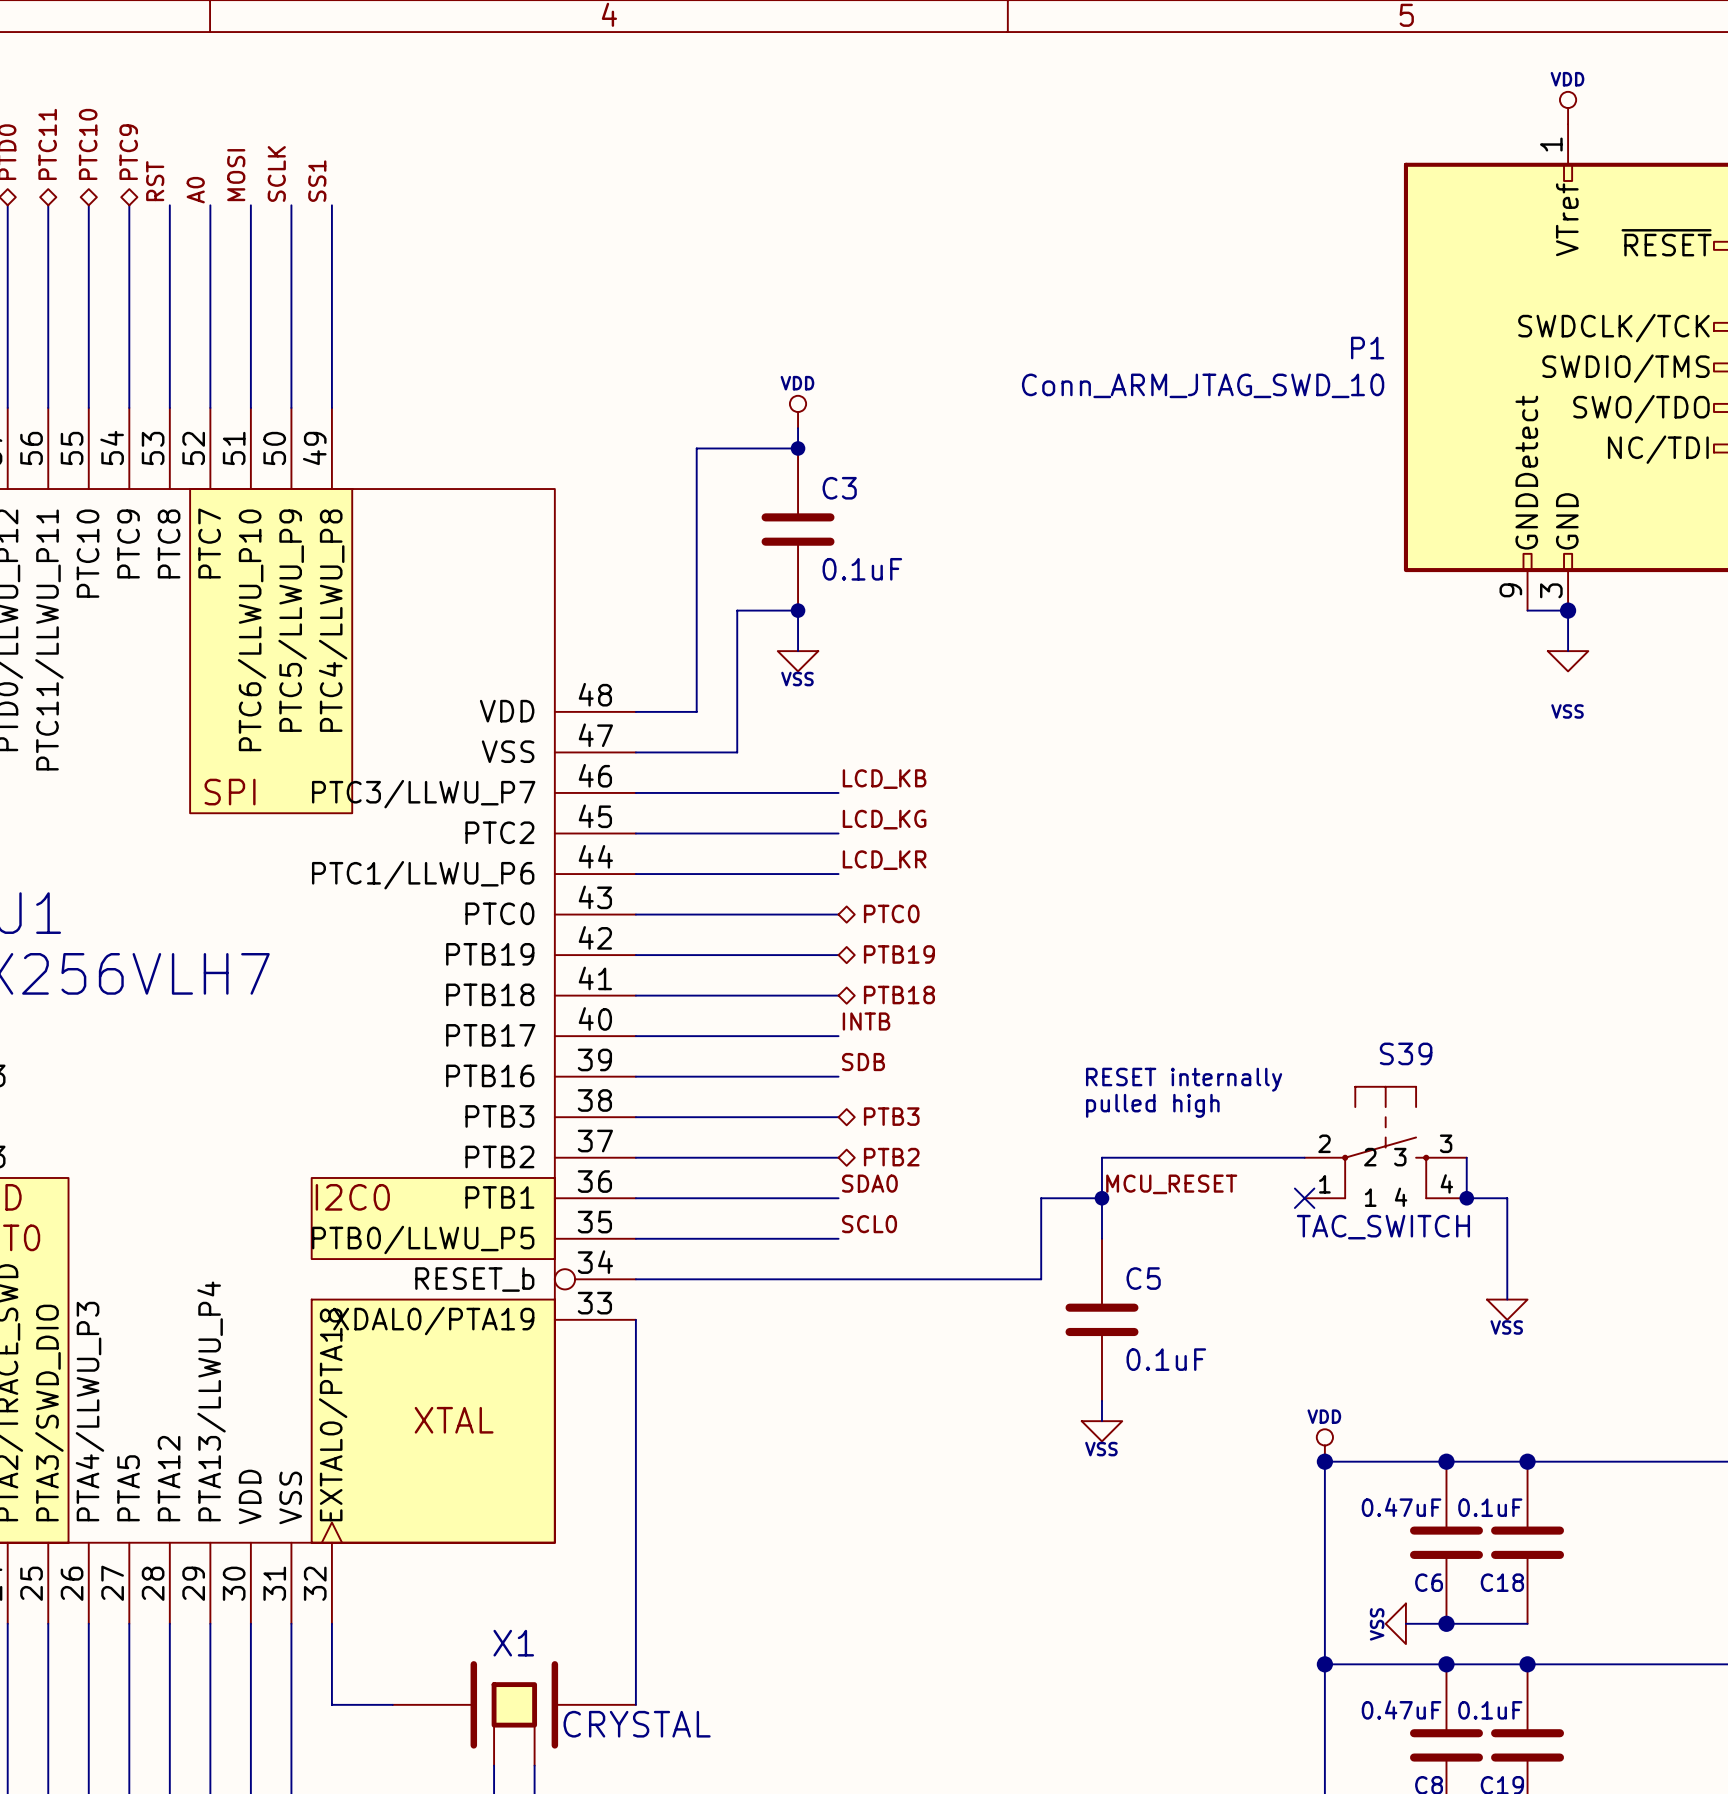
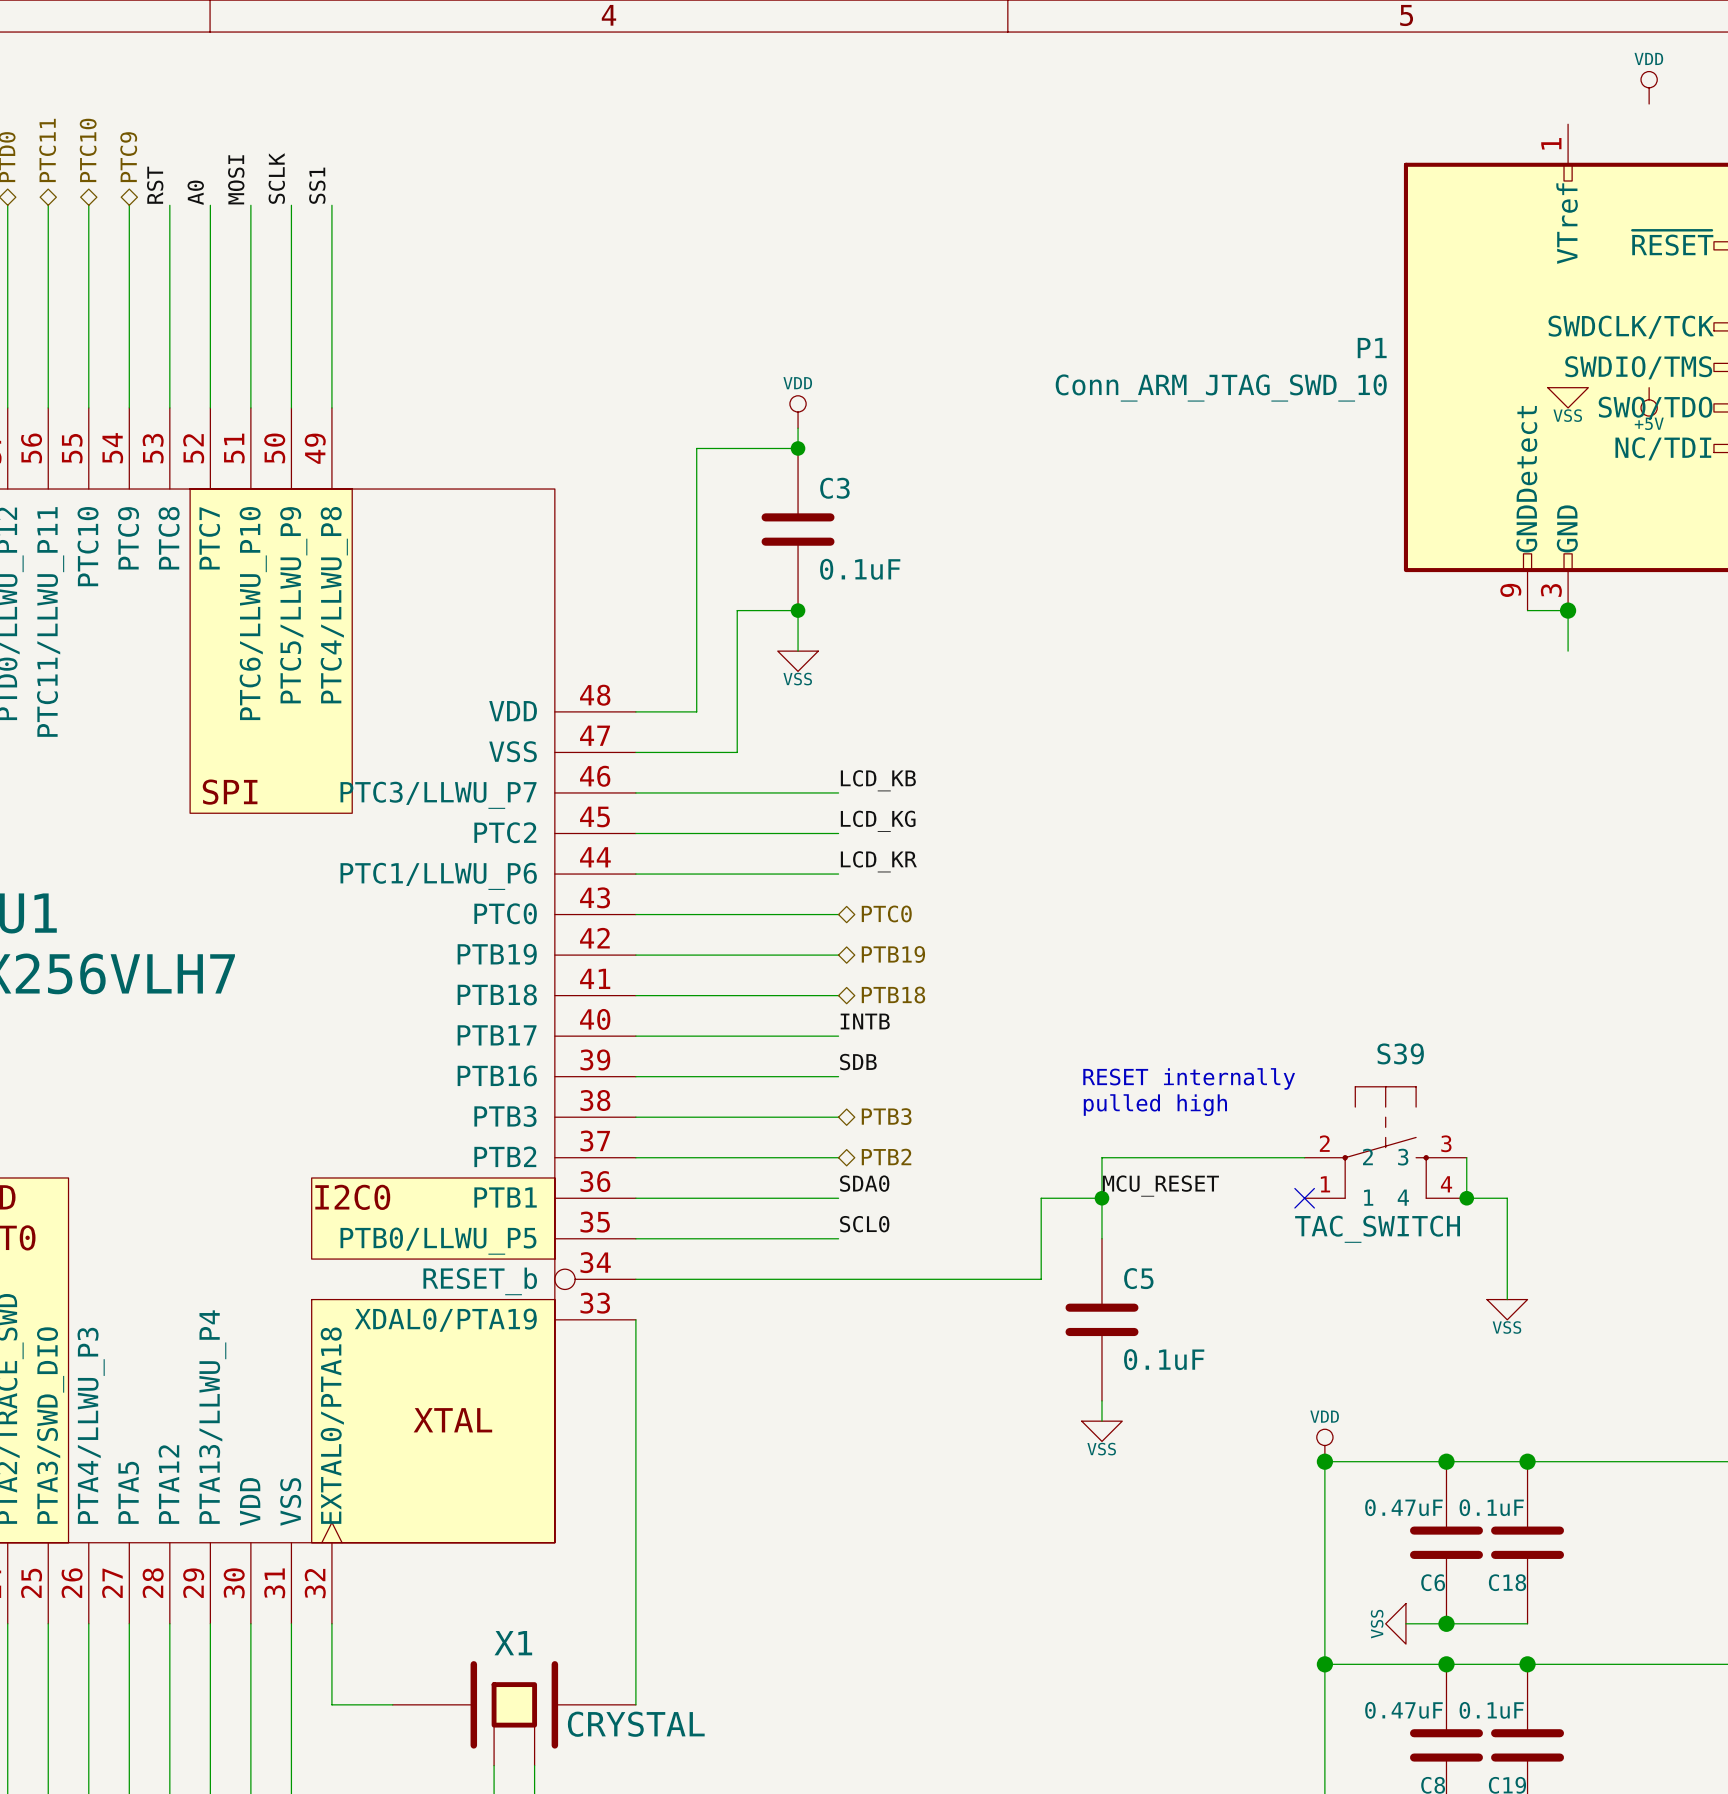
power symbol position: VDD (1568, 108) -> VDD (1649, 87)
power symbol: none -> +5V (1649, 401)
power symbol position: VSS (1568, 661) -> VSS (1568, 397)
power symbol text position: VSS (1567, 711) -> VSS (1567, 415)

